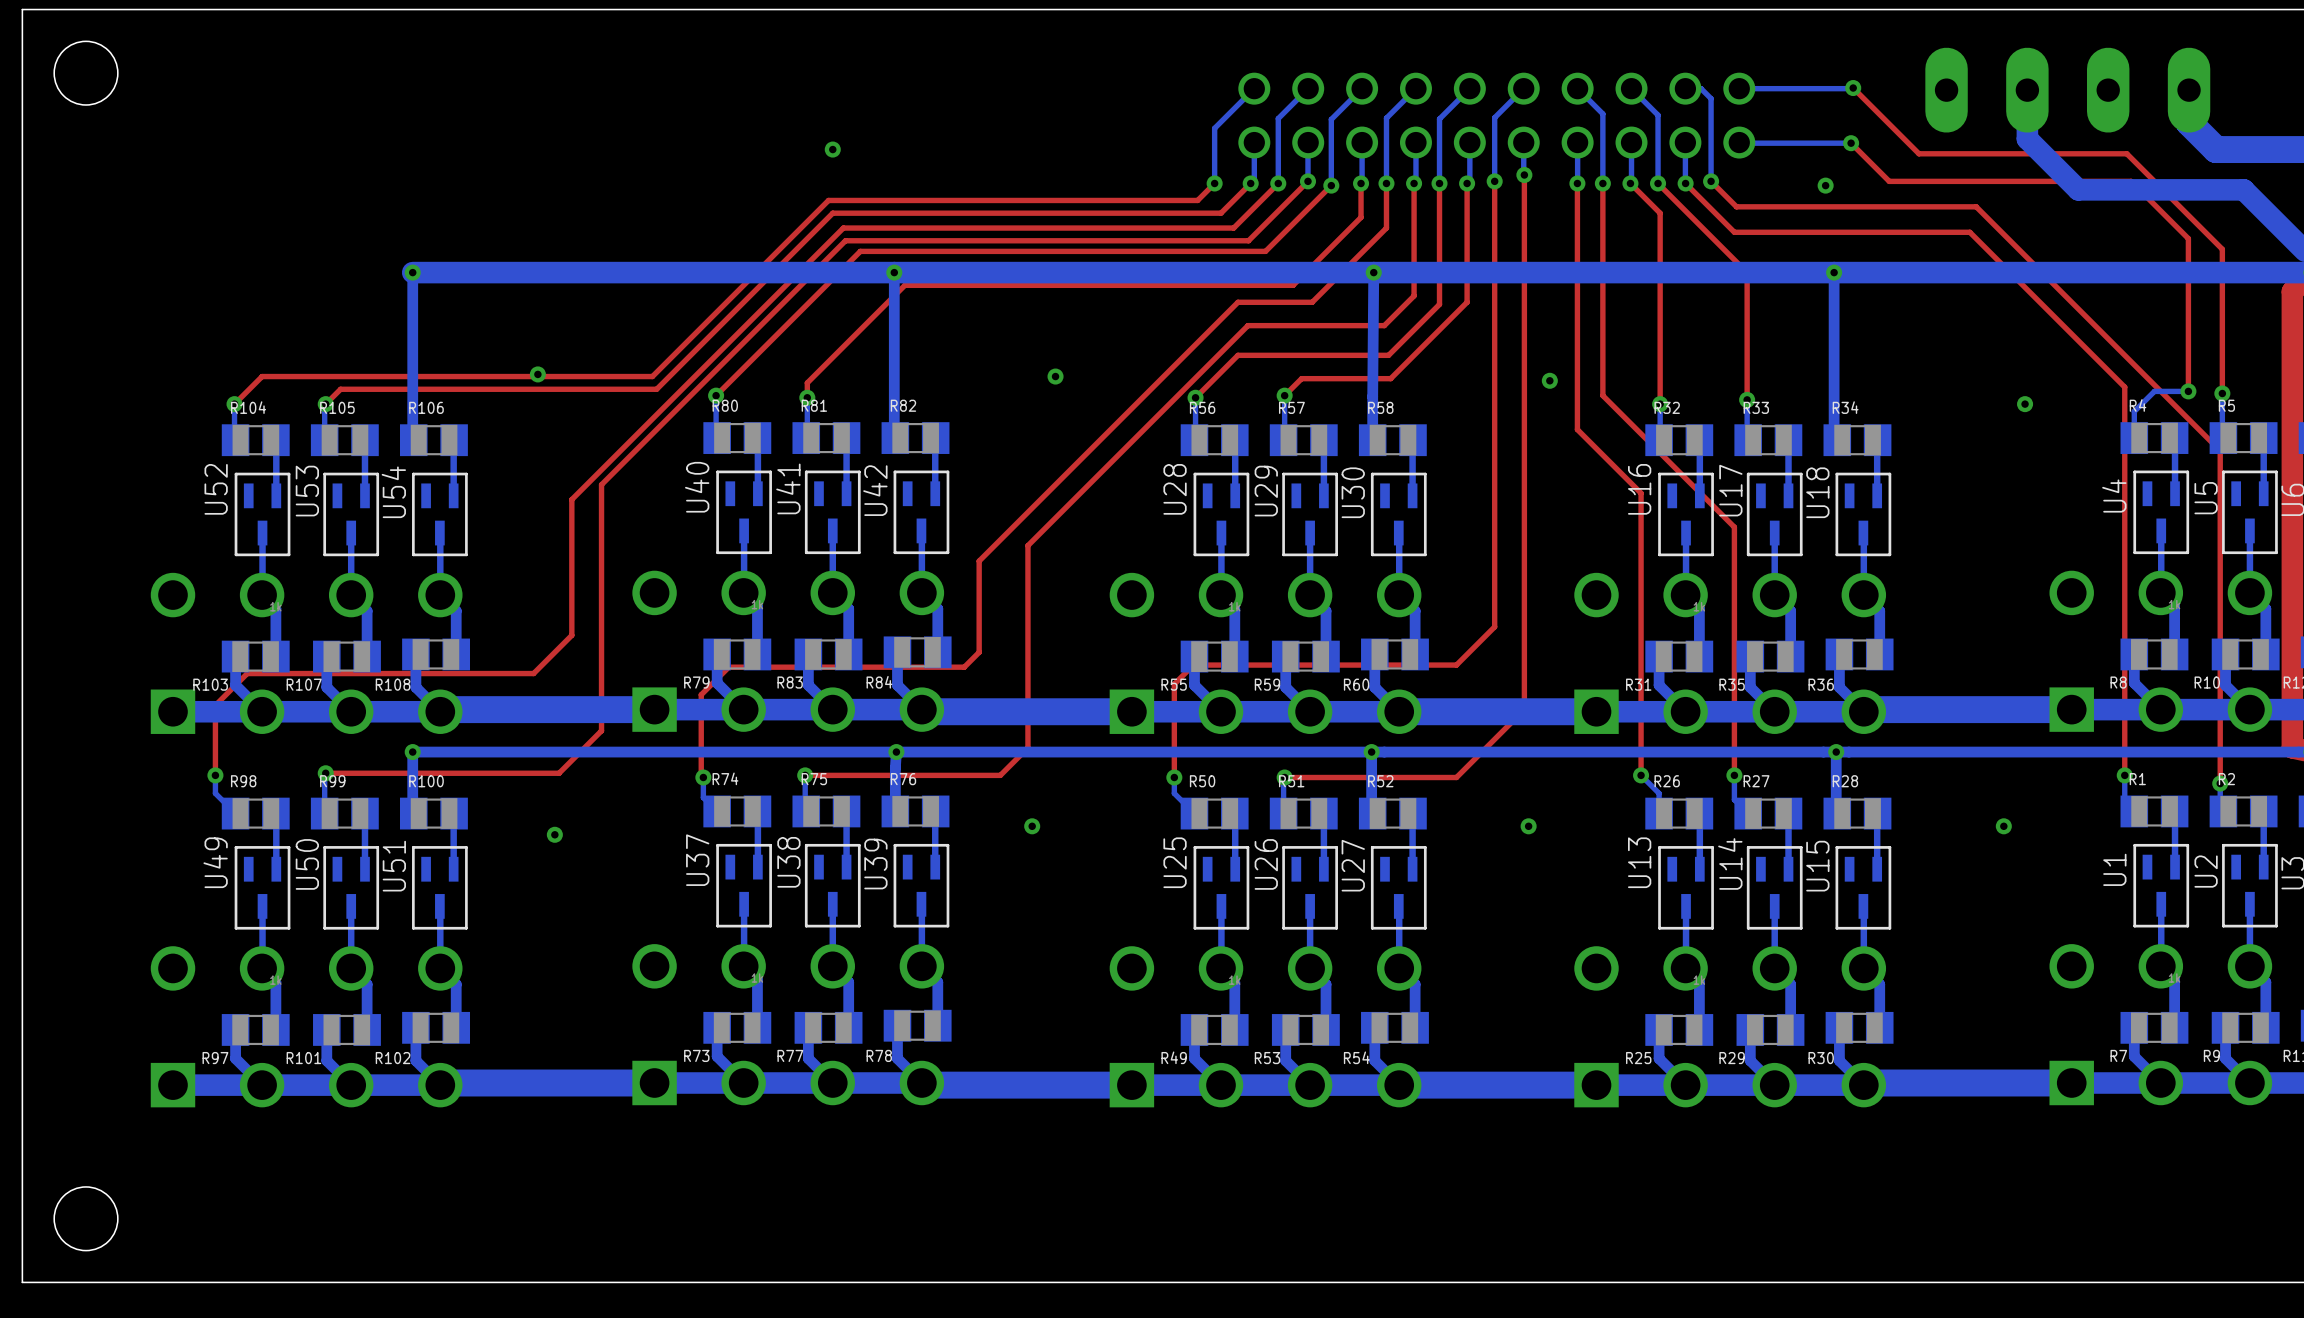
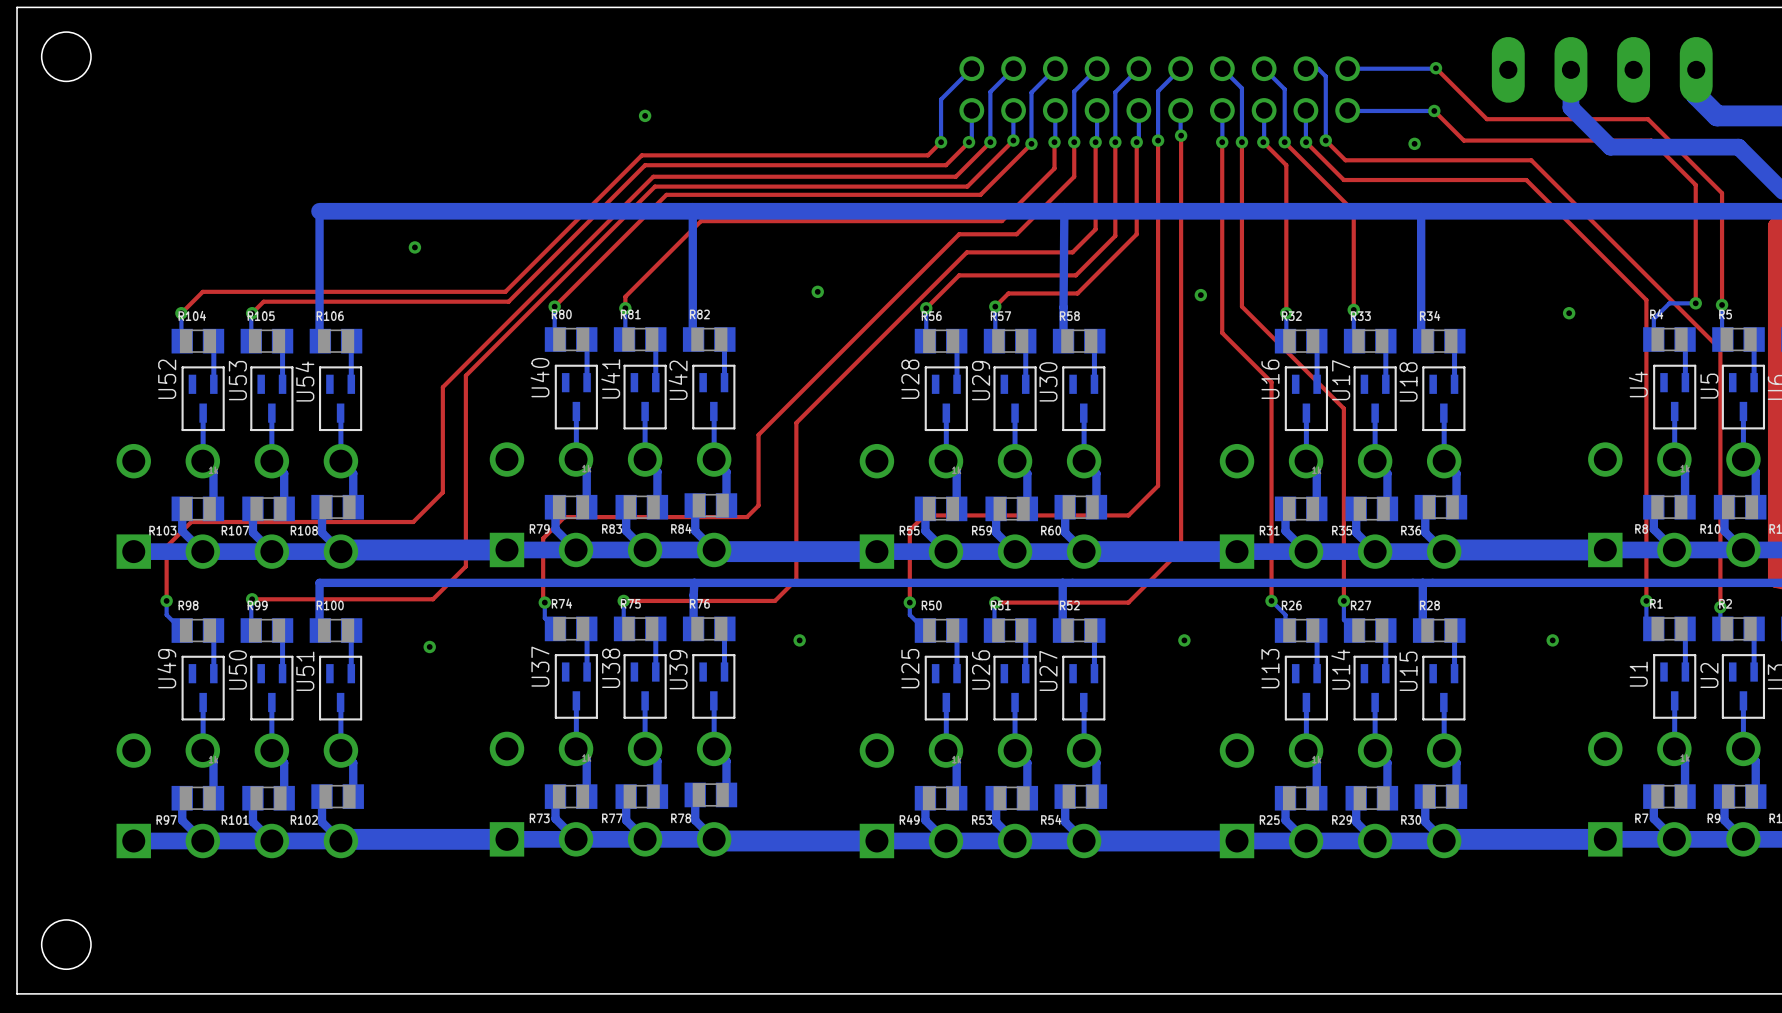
via: (412, 272) -> none
via: (894, 272) -> none
via: (1373, 272) -> none
via: (1834, 272) -> none
via position: (537, 374) -> (414, 247)
via: (412, 752) -> none
via: (896, 752) -> none
via: (1371, 752) -> none
via: (1836, 752) -> none

